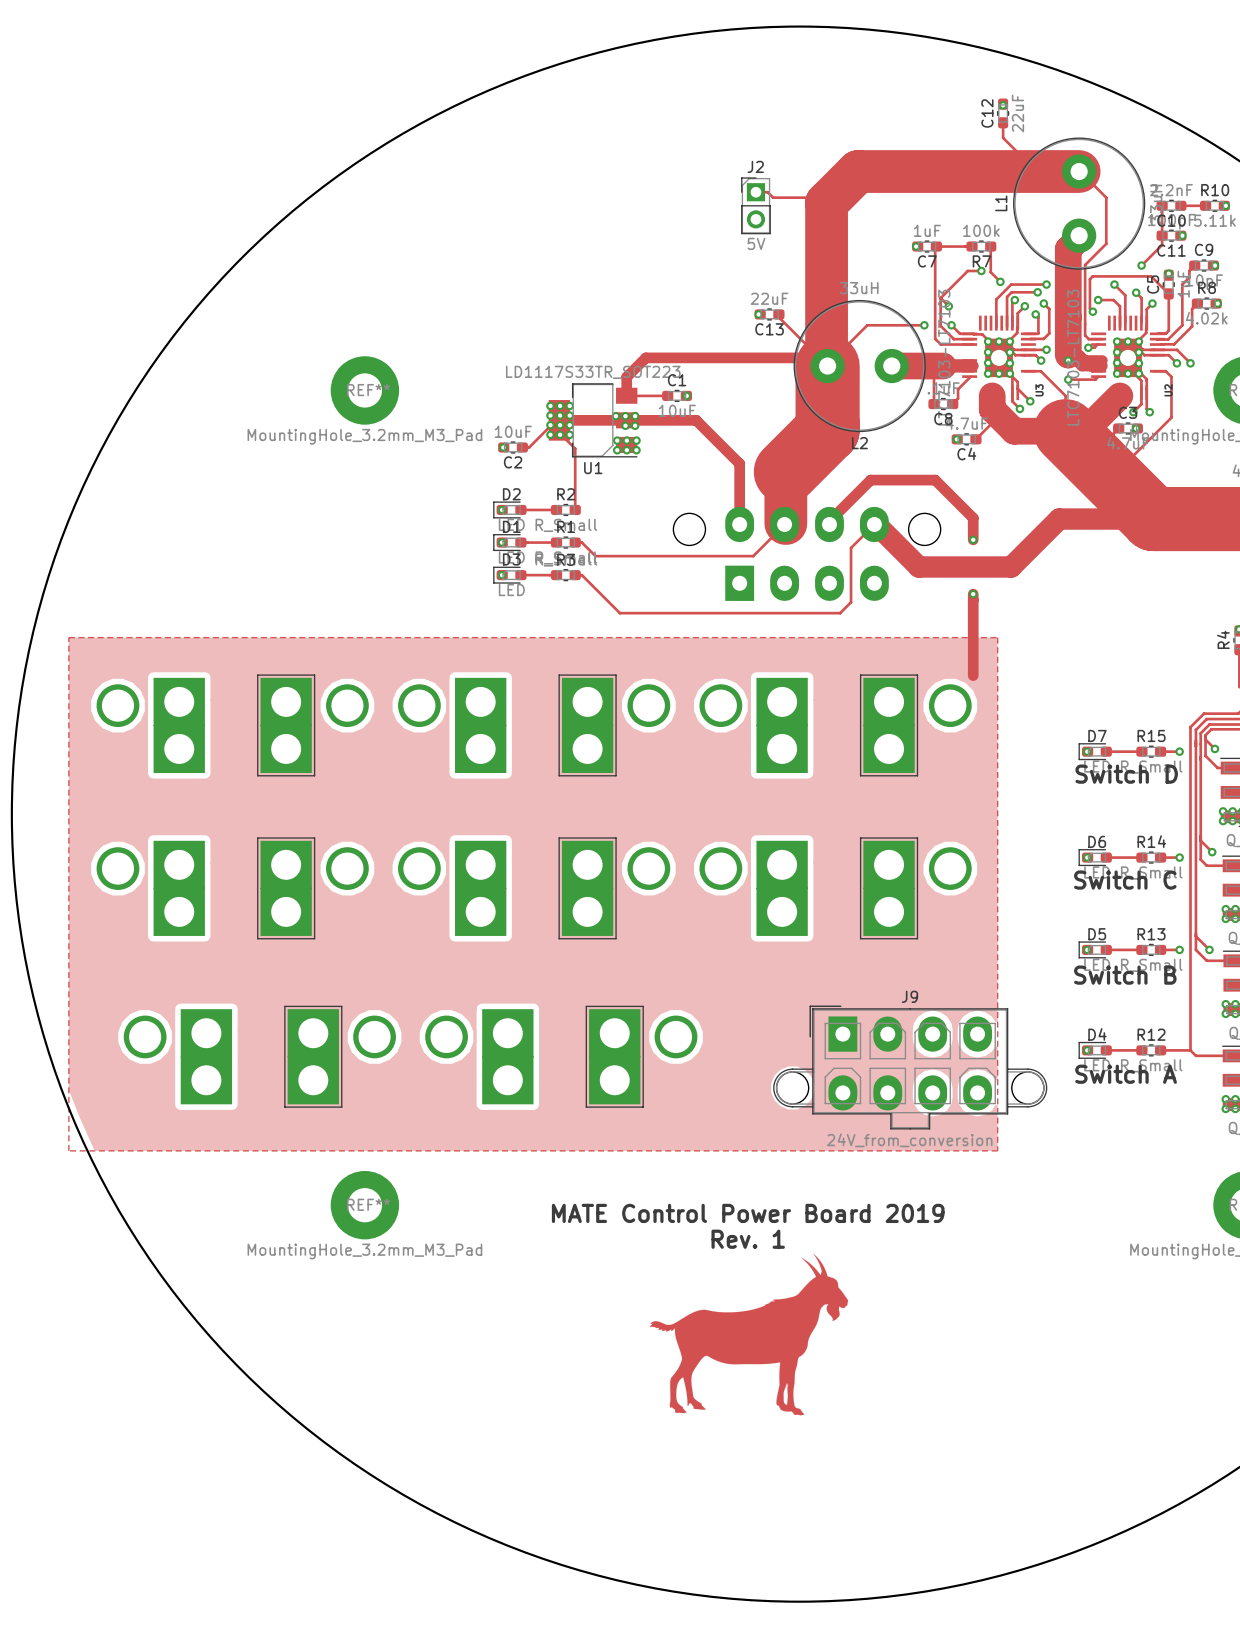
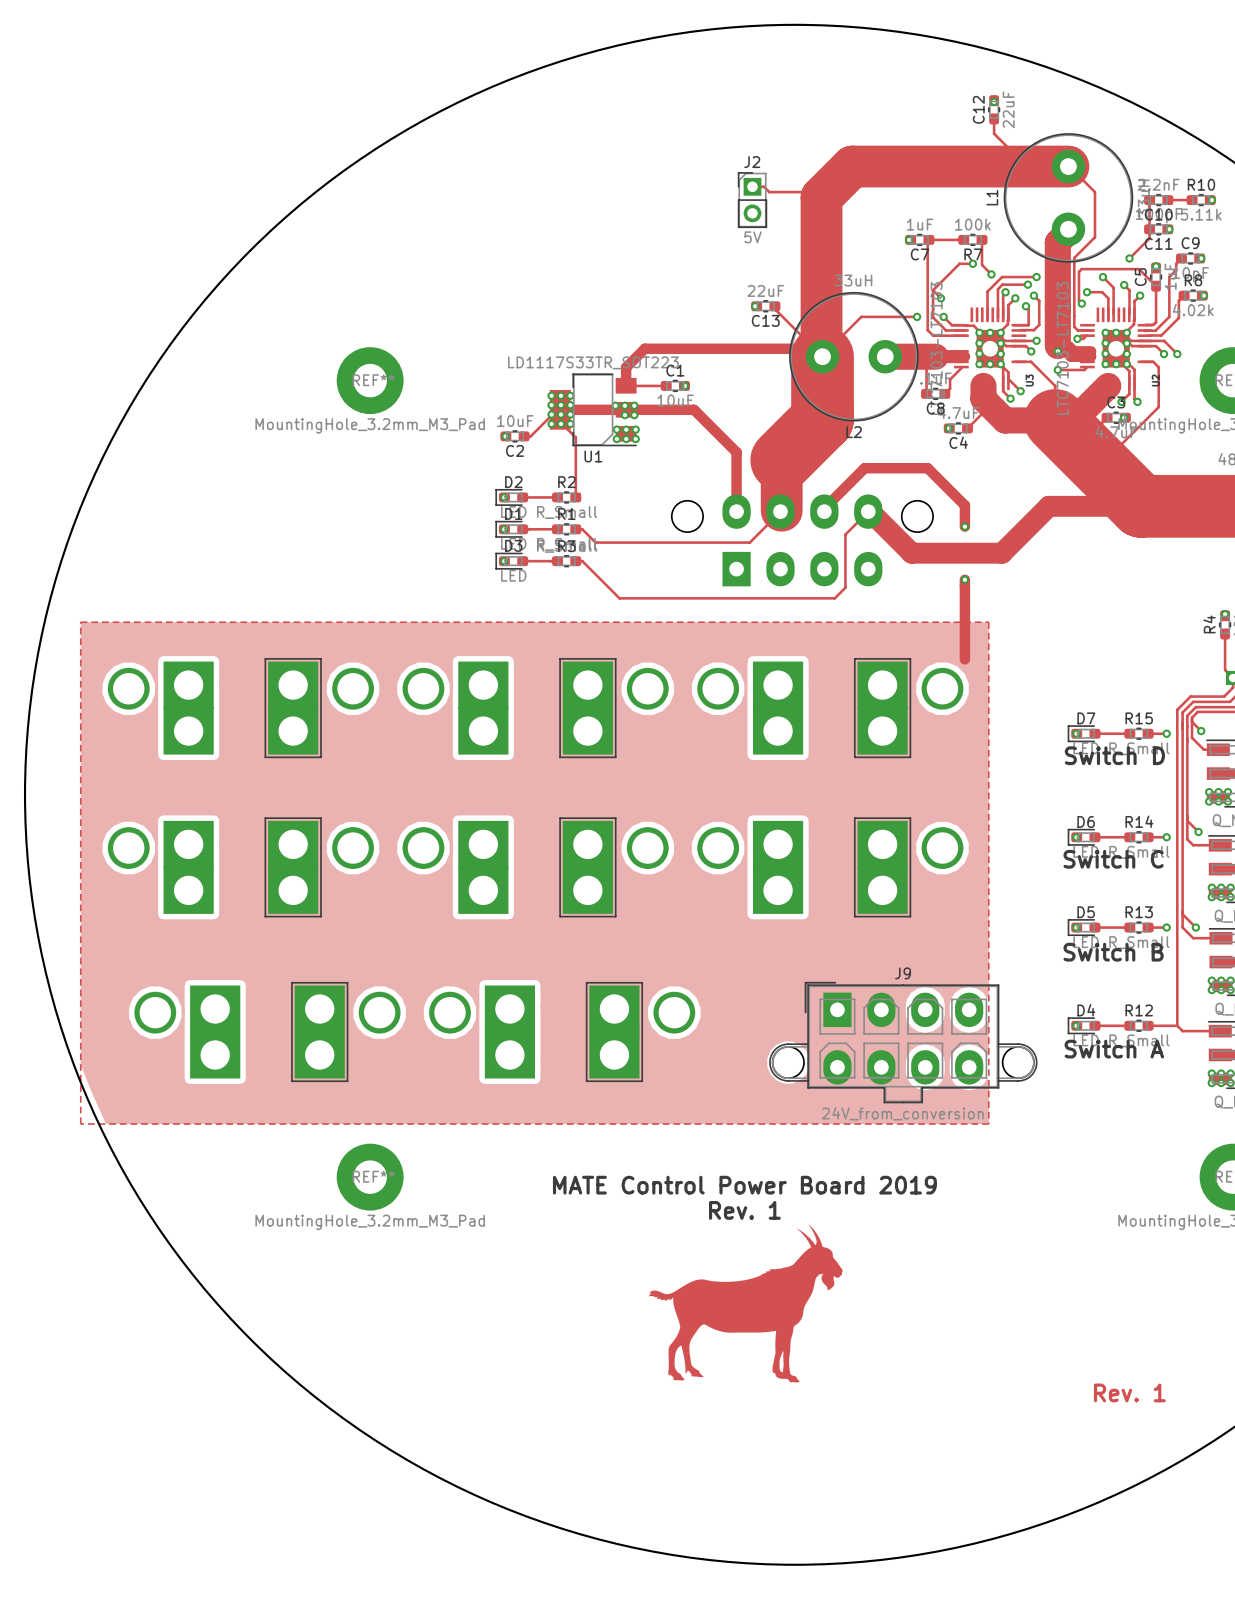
text: none -> Rev. 1 (1129, 1392)

